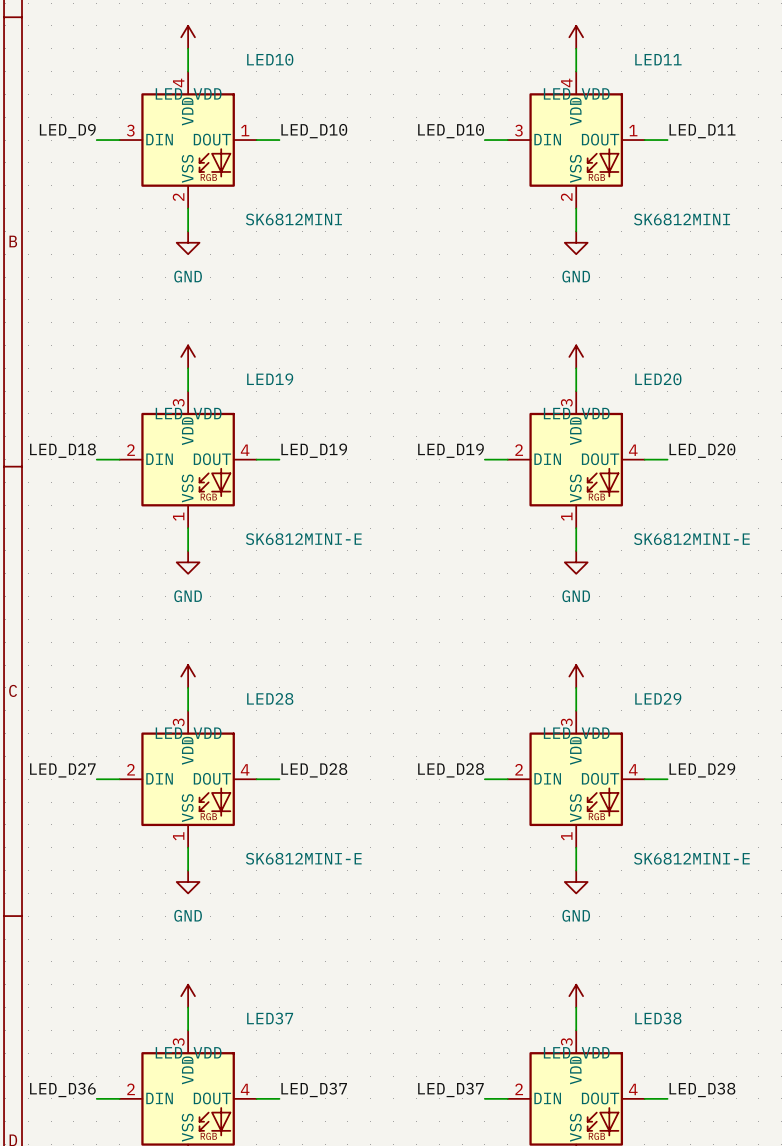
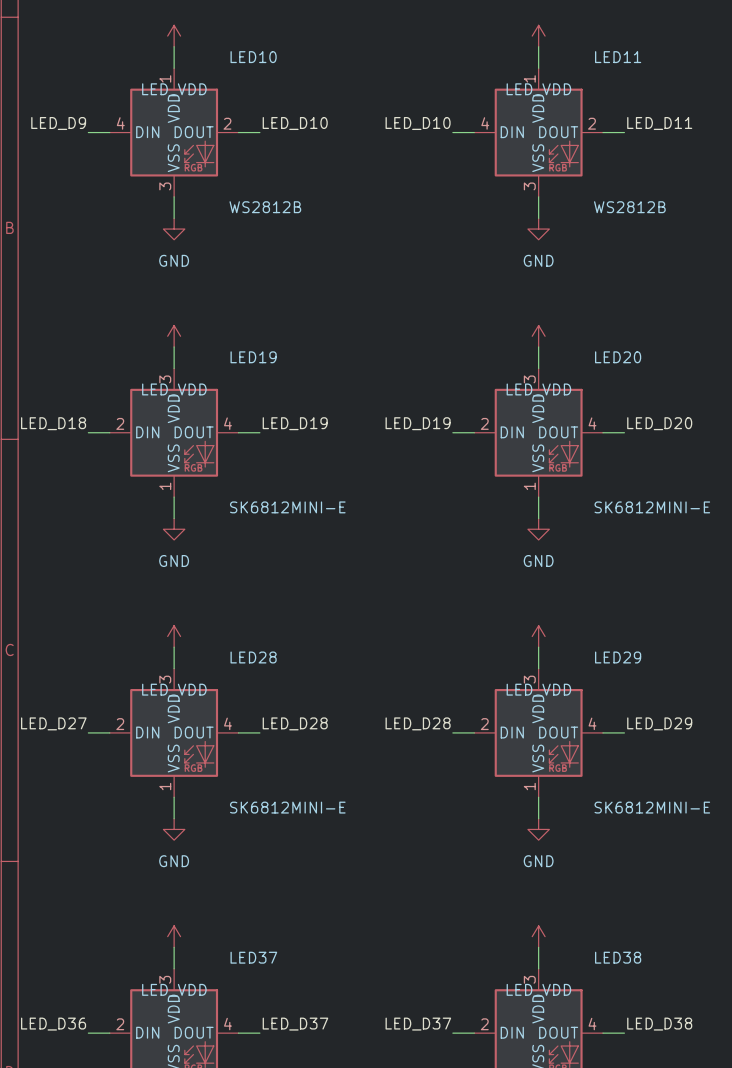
LED10 pin number: 4 (178, 82) -> 1 (165, 78)
LED11 pin number: 4 (566, 82) -> 1 (529, 78)
LED10 pin number: 3 (130, 130) -> 4 (120, 123)
LED10 pin number: 1 (245, 130) -> 2 (227, 123)
LED11 pin number: 3 (518, 130) -> 4 (485, 123)
LED11 pin number: 1 (633, 130) -> 2 (591, 123)
LED10 pin number: 2 (178, 197) -> 3 (165, 186)
LED11 pin number: 2 (566, 197) -> 3 (529, 186)
LED10 value: SK6812MINI (293, 219) -> WS2812B (265, 207)
LED11 value: SK6812MINI (682, 219) -> WS2812B (629, 207)

